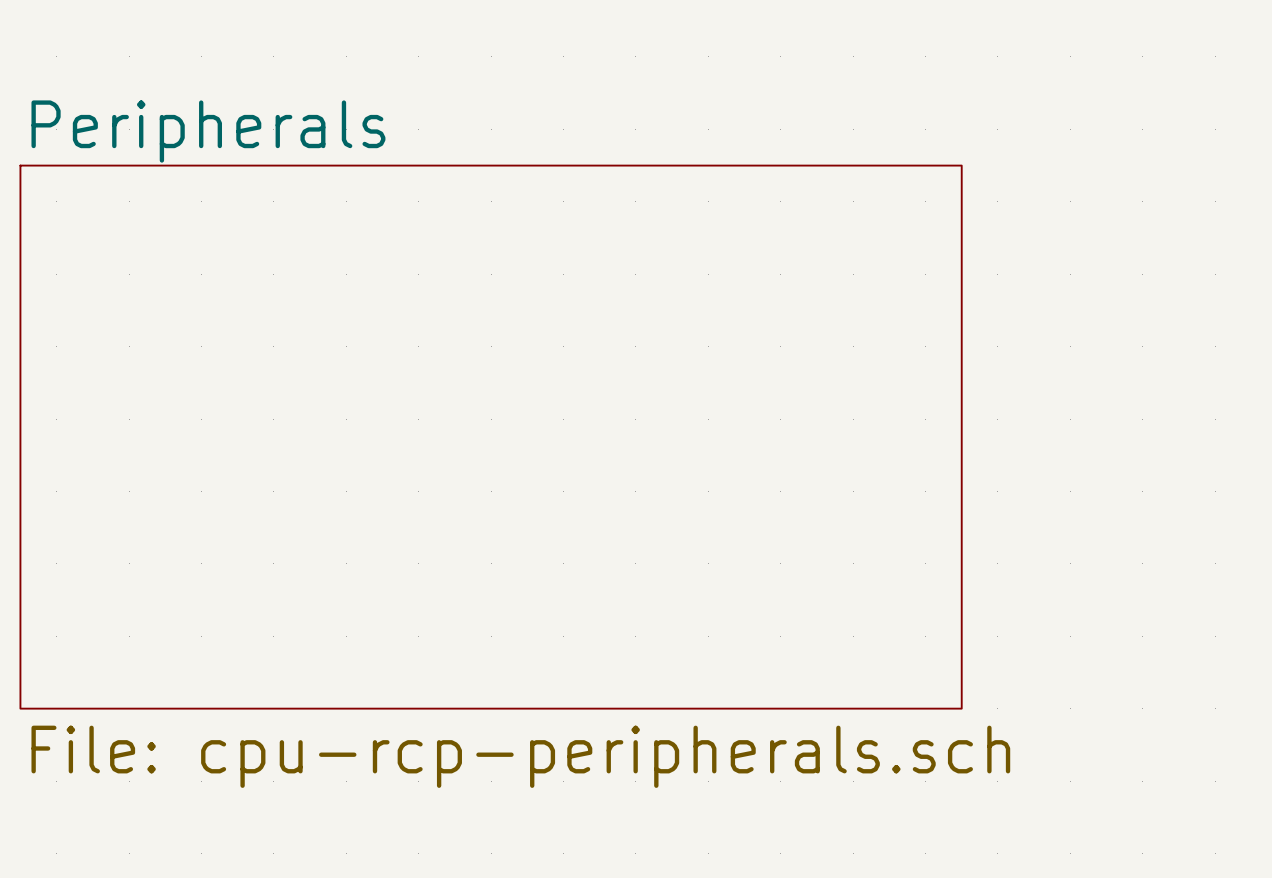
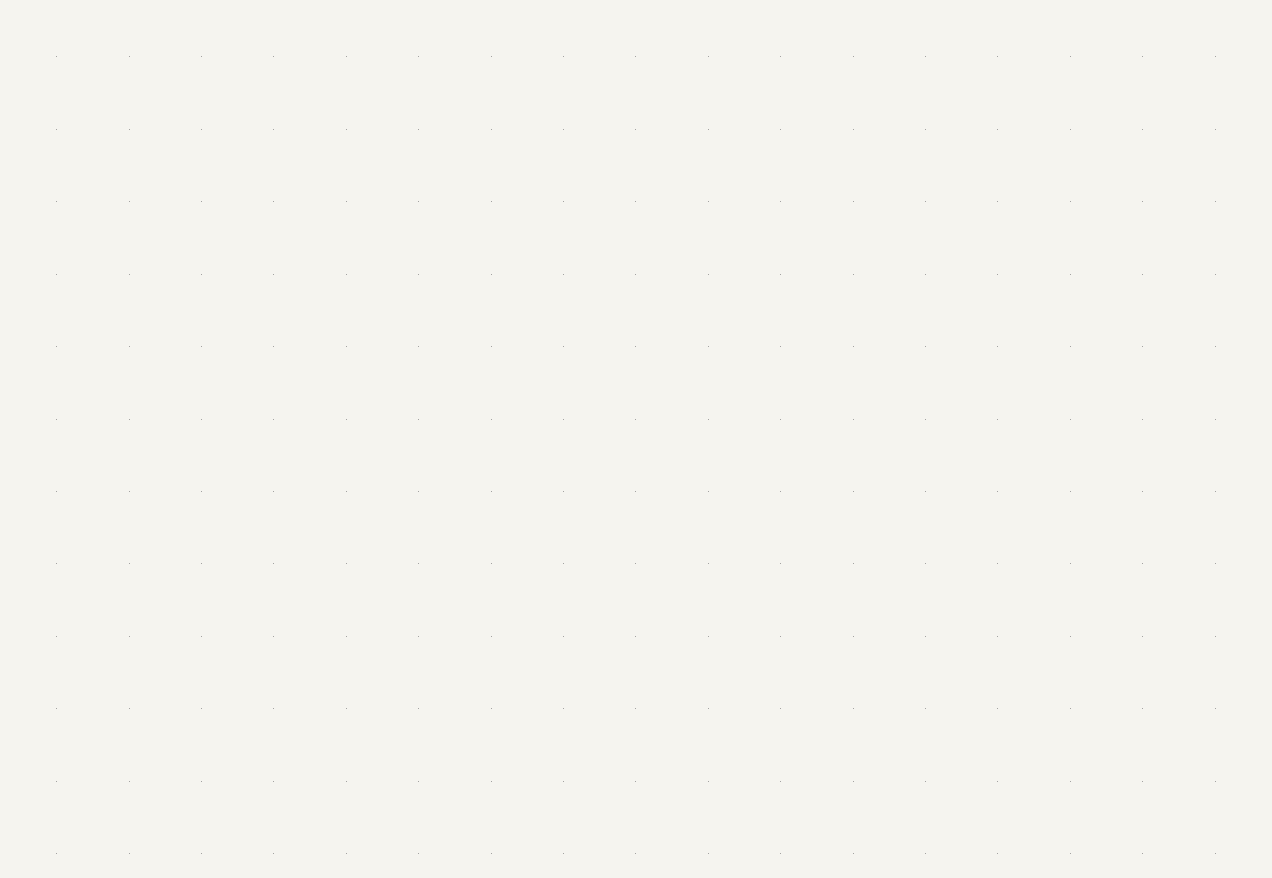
sheet Peripherals: File: cpu-rcp-peripherals.sch (491, 437) -> none

